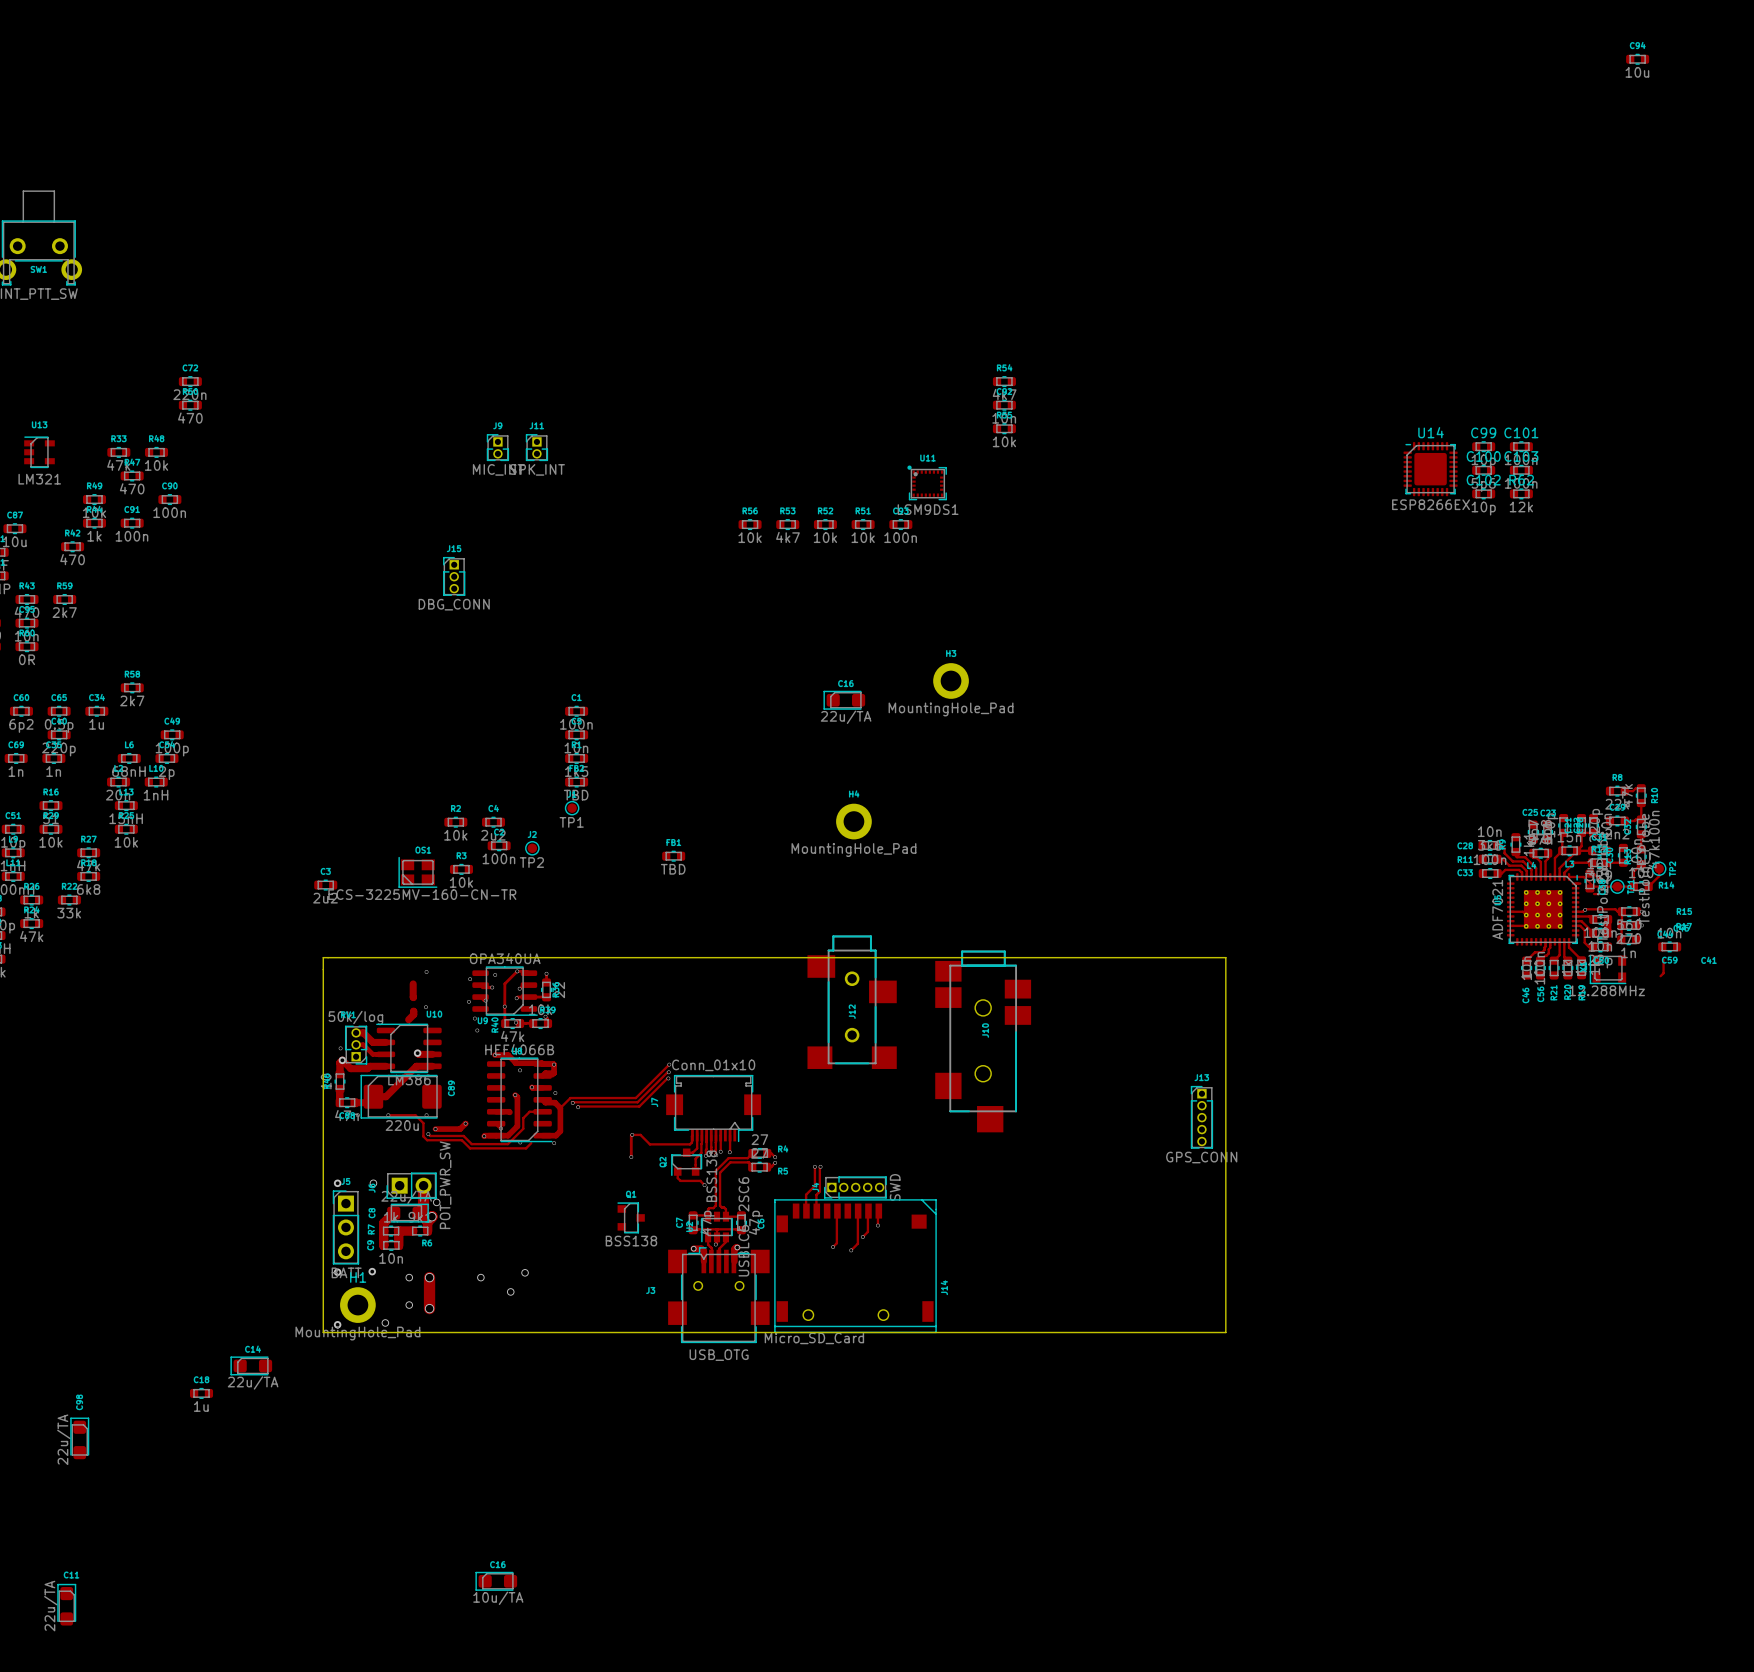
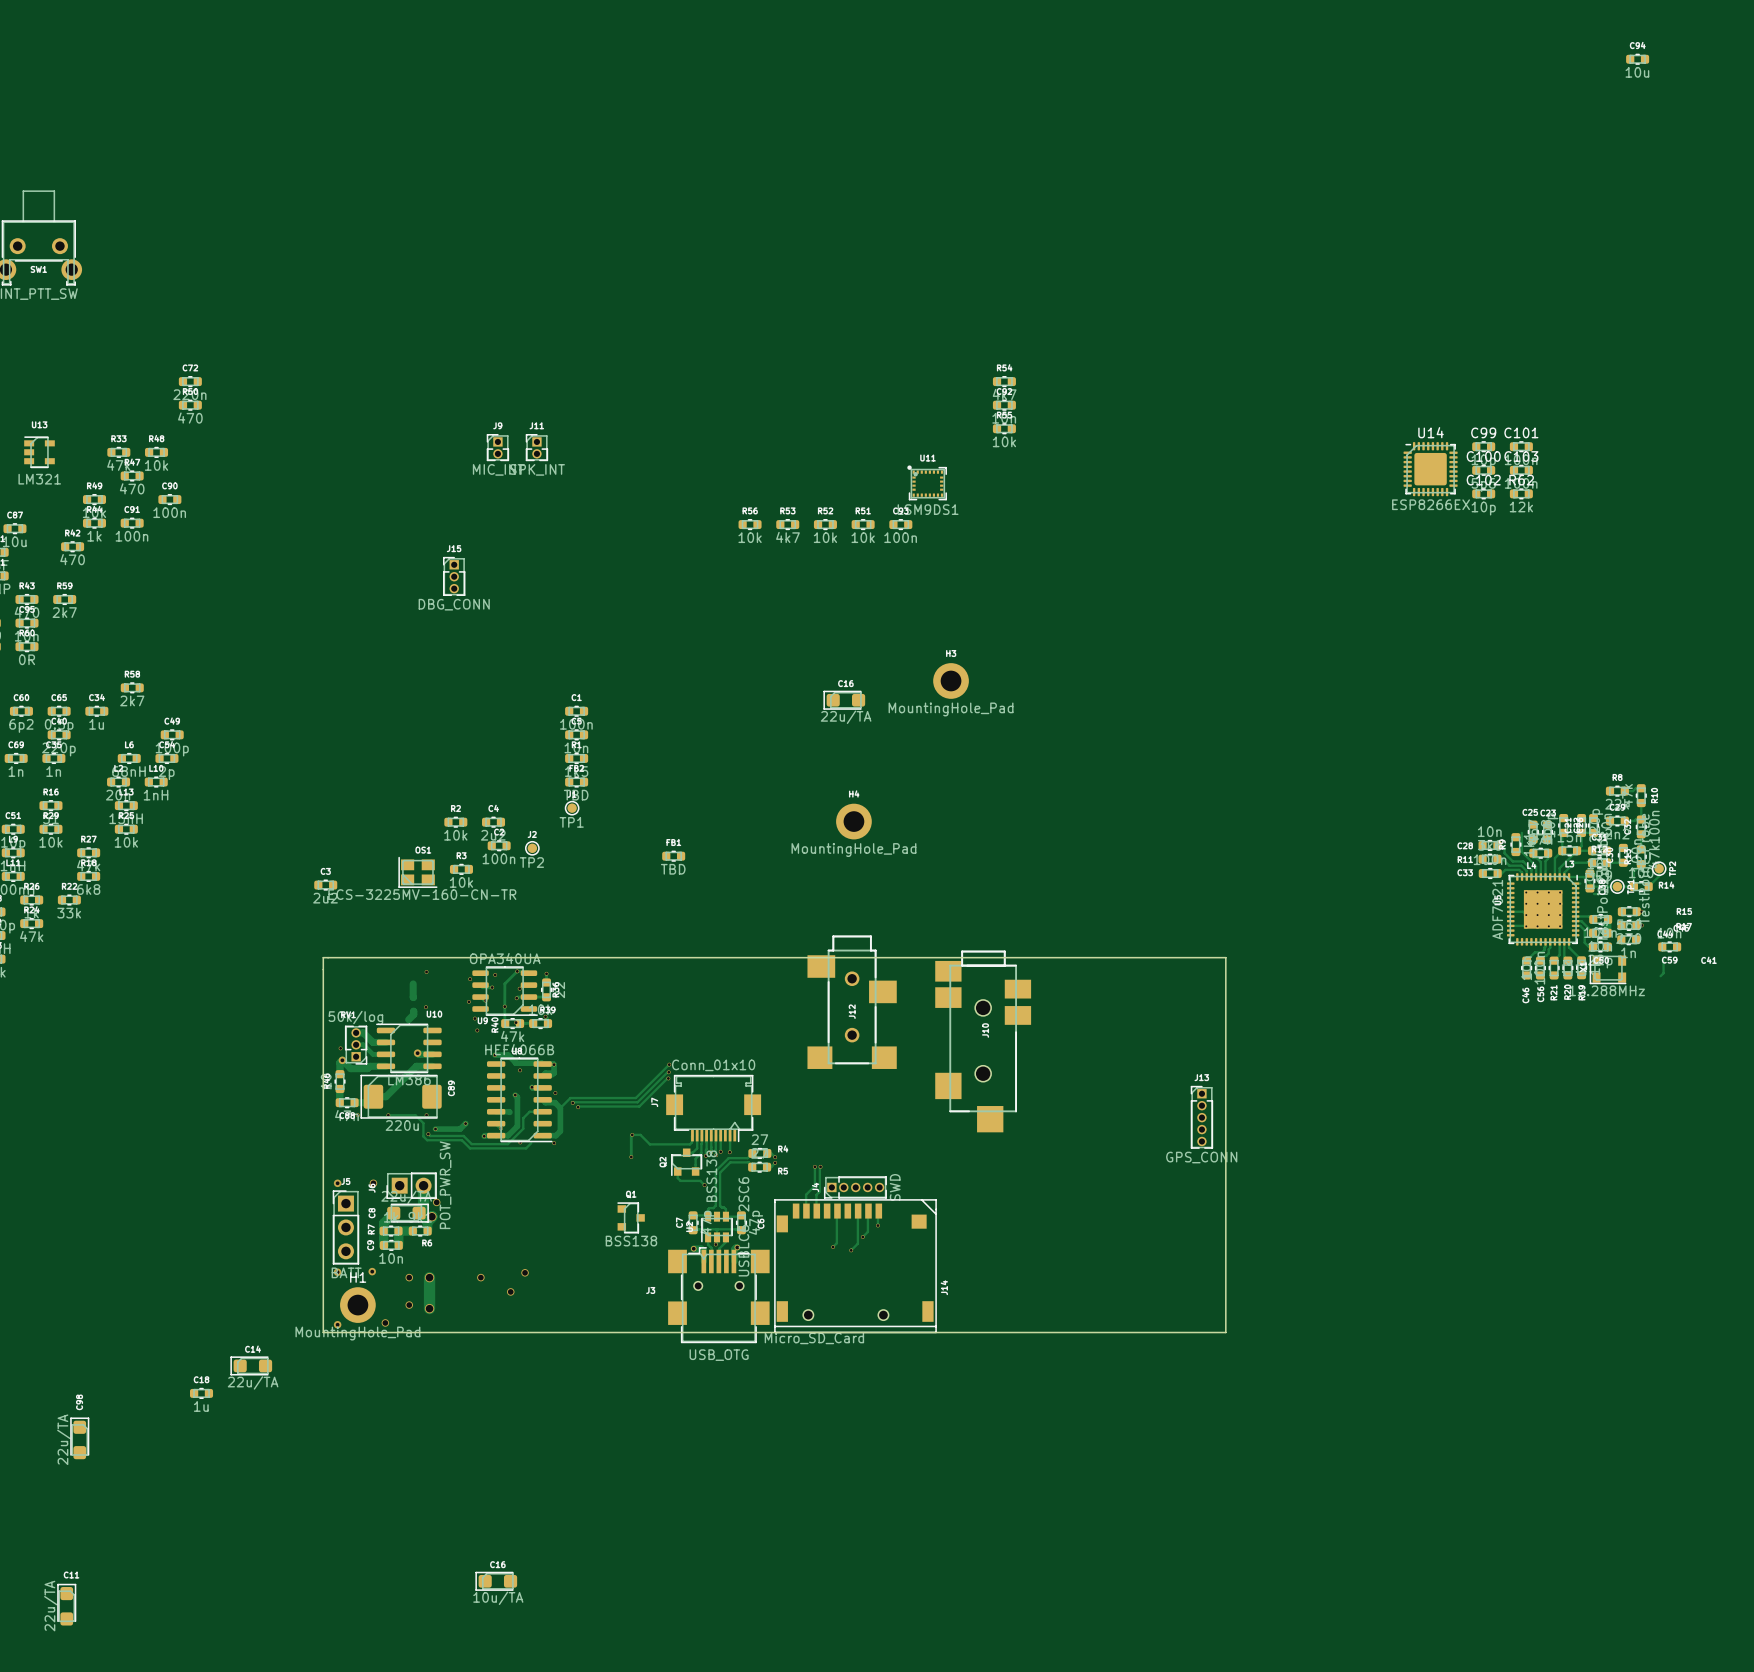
track: (1515, 852) (1517, 857) (1525, 857) (1536, 868) -> (1521, 832) (1521, 852) (1536, 868)
via: (1585, 909) -> none
track: (1575, 911) (1582, 911) (1585, 909) (1615, 909) (1621, 911) (1621, 939) -> none

